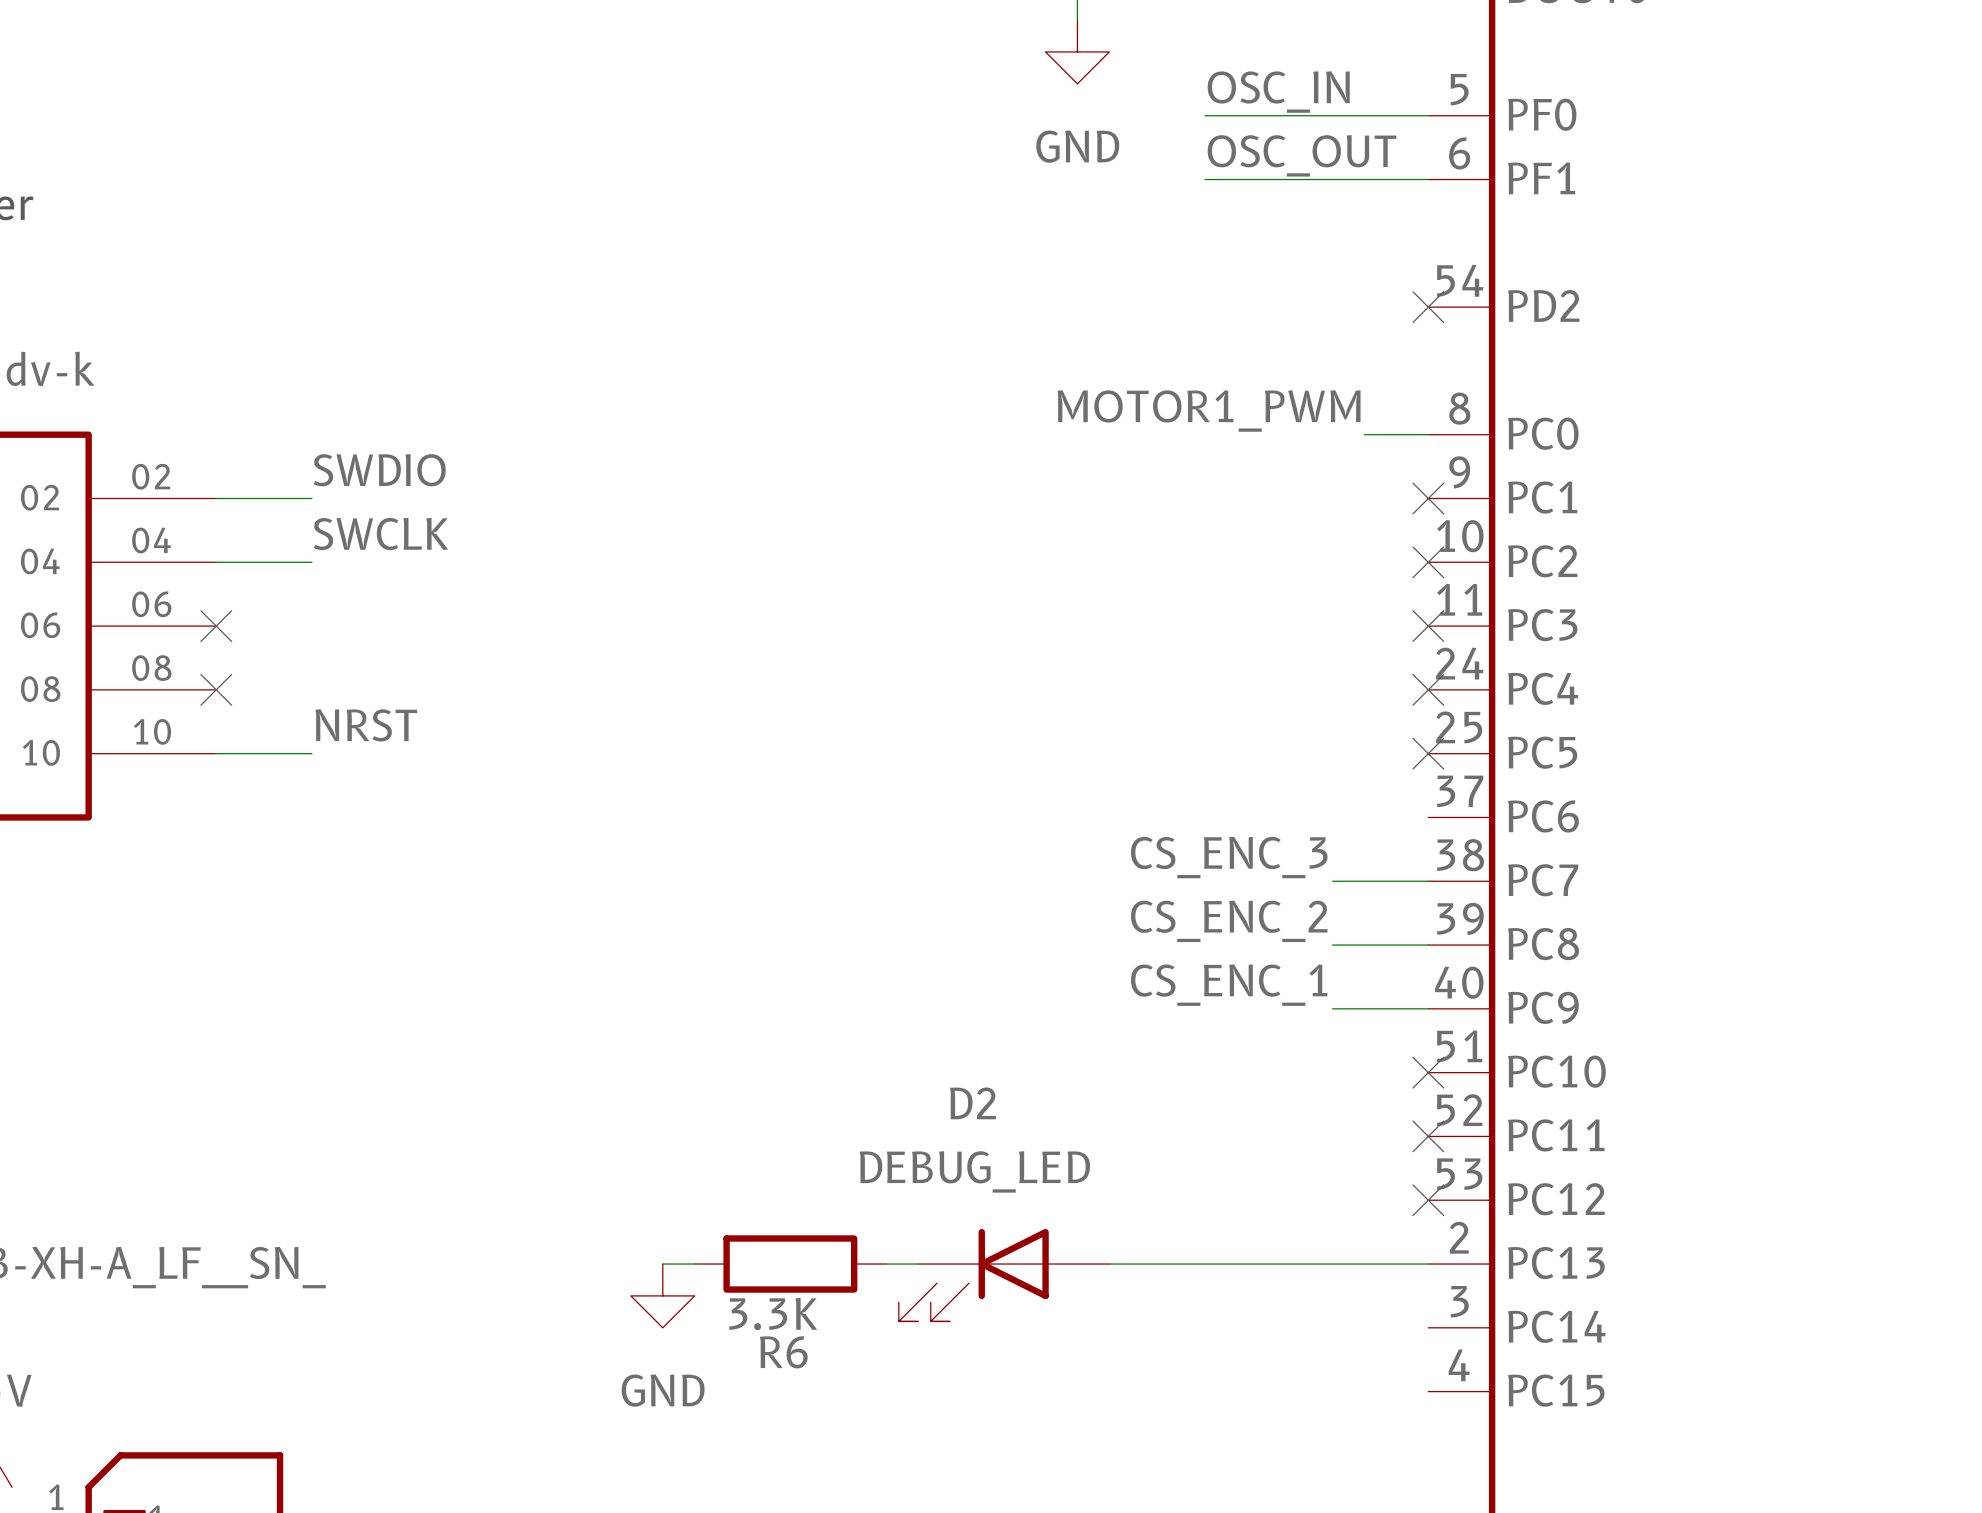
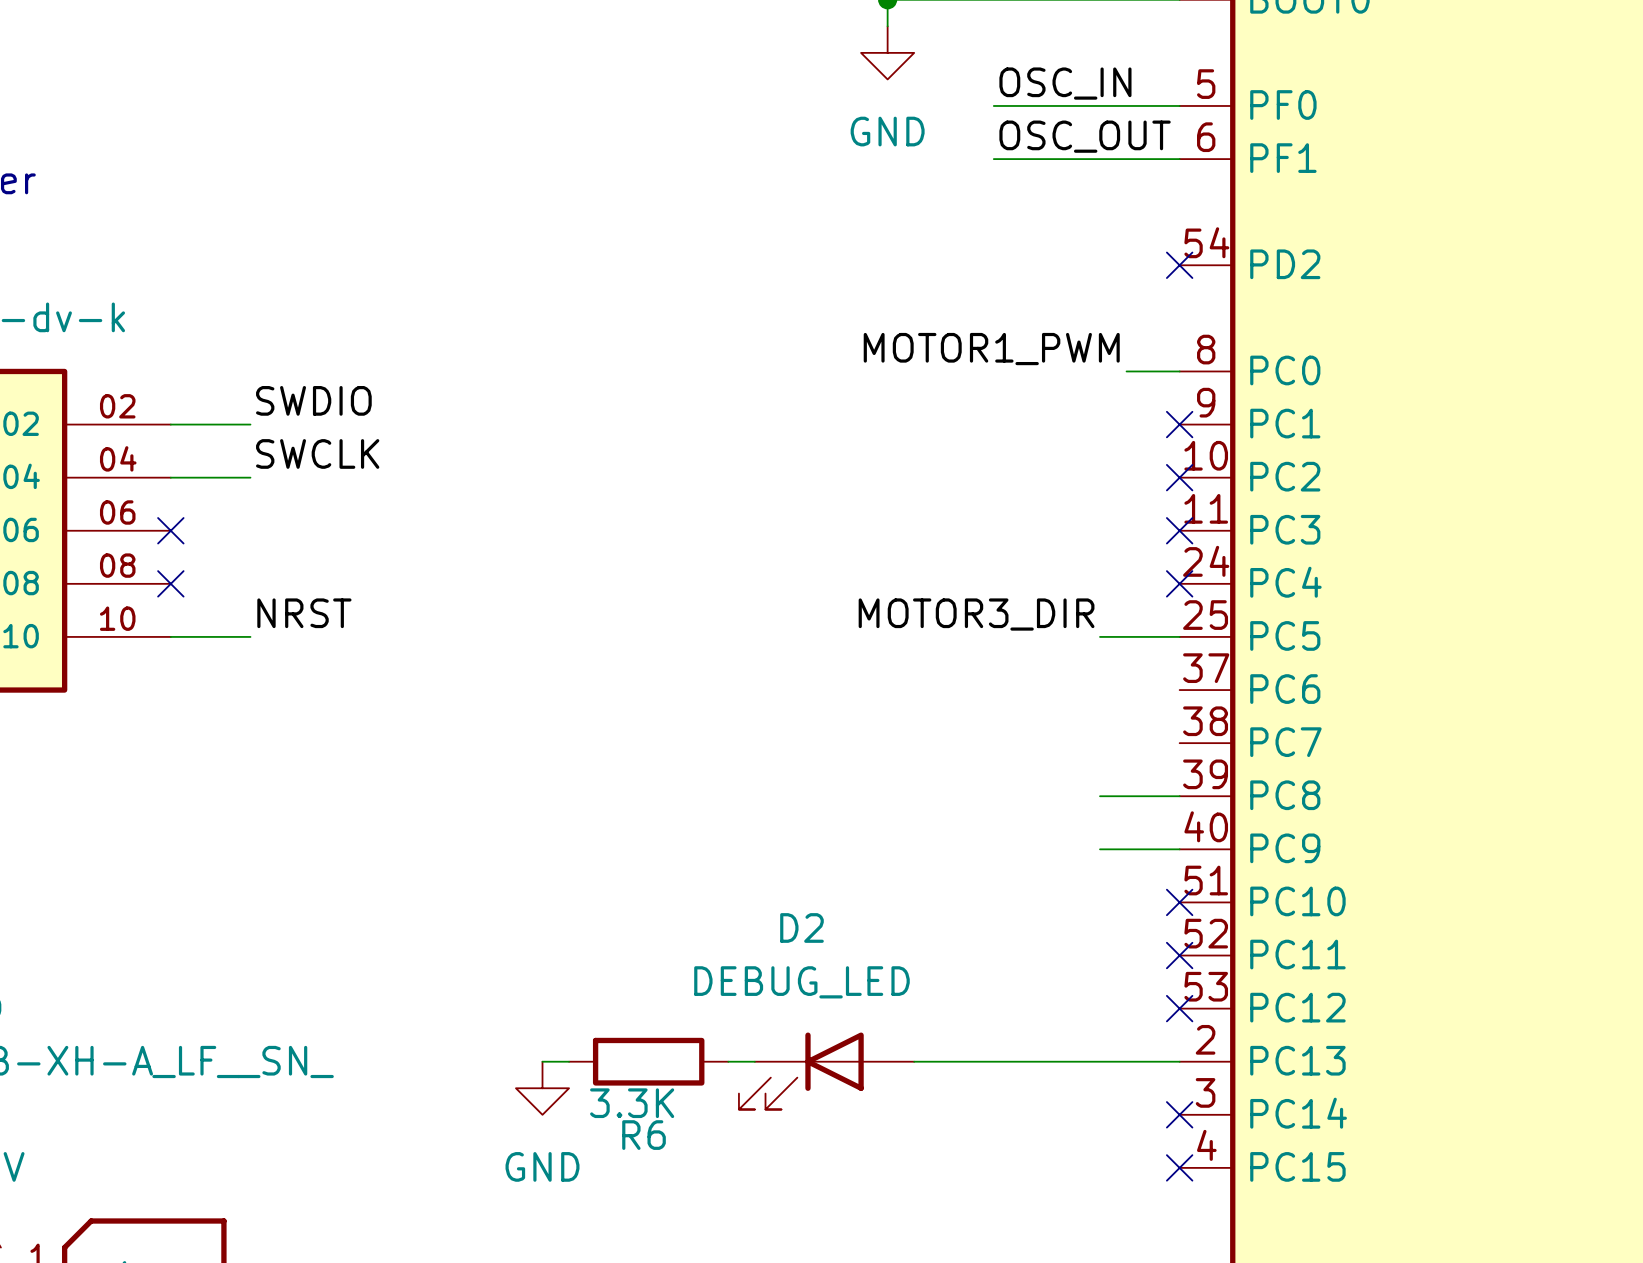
label: none -> MOTOR3_DIR (976, 614)
no-connect mark: (1428, 753) -> none
label: CS_ENC_3 (1229, 857) -> none
wire: (1332, 881) (1428, 881) -> (1100, 636) (1179, 636)
label: CS_ENC_2 (1229, 921) -> none
label: CS_ENC_1 (1229, 985) -> none
no-connect mark: none -> (1179, 1114)
no-connect mark: none -> (1179, 1167)

